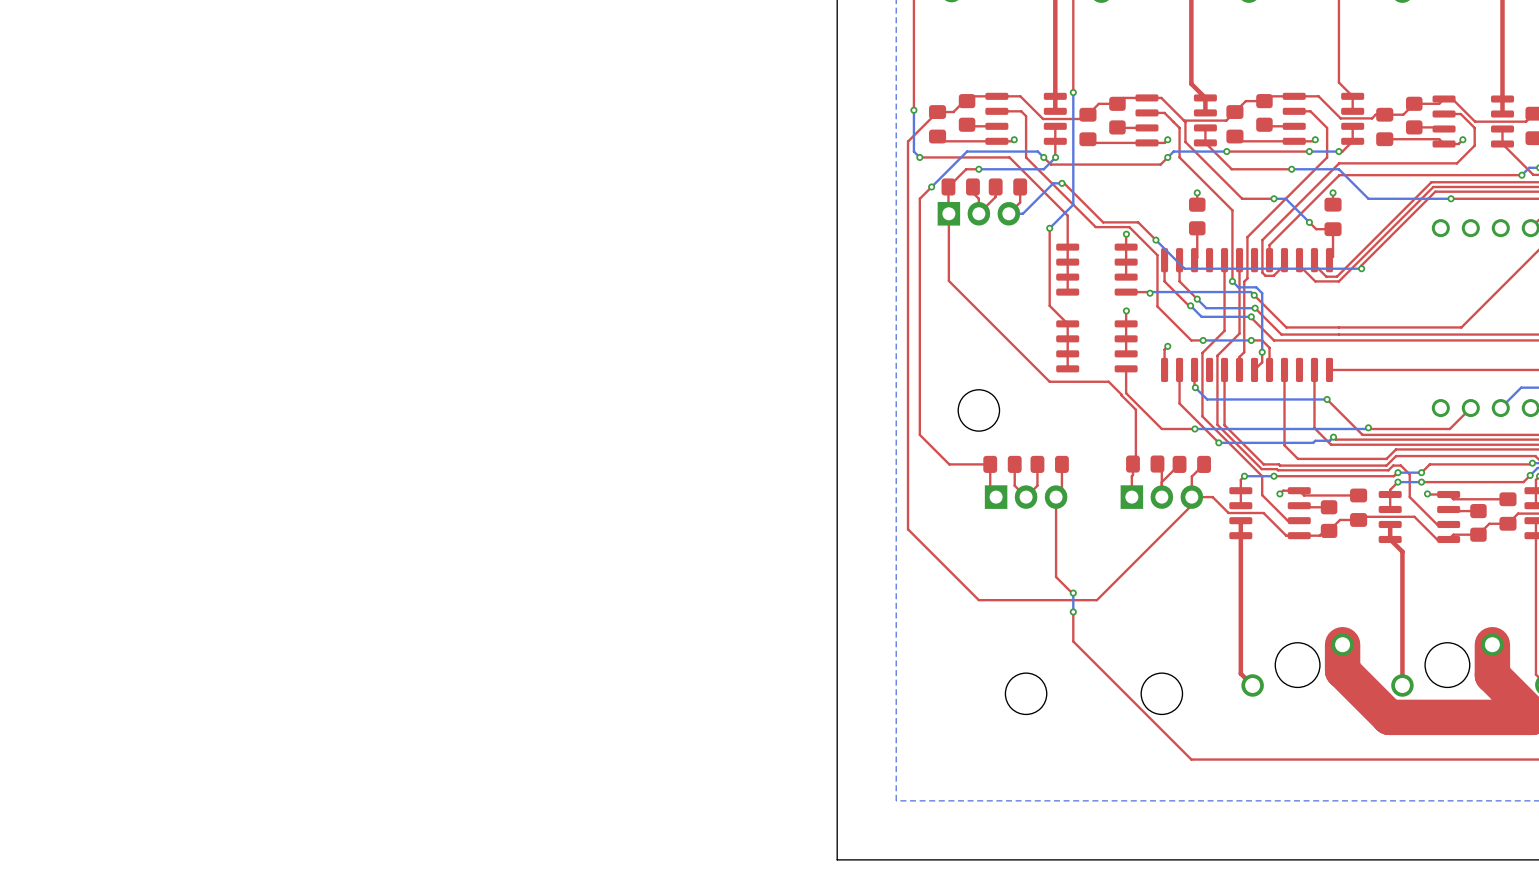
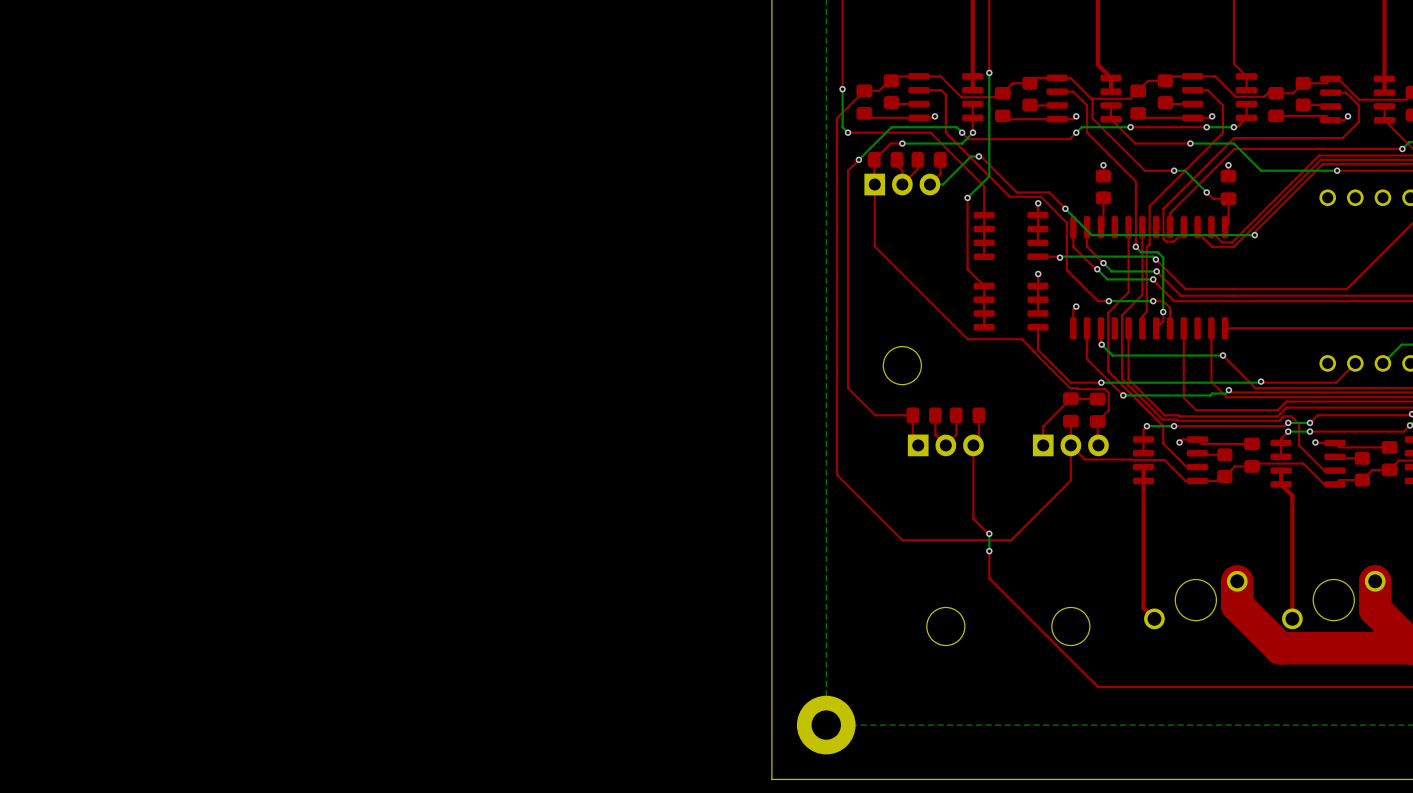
top track: (1135, 409) (1135, 463) (1132, 464) (1132, 475) -> (1046, 364) (1070, 388) (1105, 389) (1108, 392) (1108, 410) (1097, 421) (1097, 444)
top track: none -> (1097, 398) (1070, 398) (1044, 425)
part rotation: 0° (1145, 464) -> 90° clockwise (1070, 409)
top track: (1179, 464) (1161, 482) -> none
part rotation: 0° (1191, 464) -> 90° clockwise (1097, 410)
top track: (1204, 464) (1191, 476) (1191, 505) (1161, 535) -> none
top track: (1191, 497) (1212, 497) (1228, 512) -> (1070, 480) (1070, 445) (1084, 459) (1131, 459)
part: none -> (826, 725)

